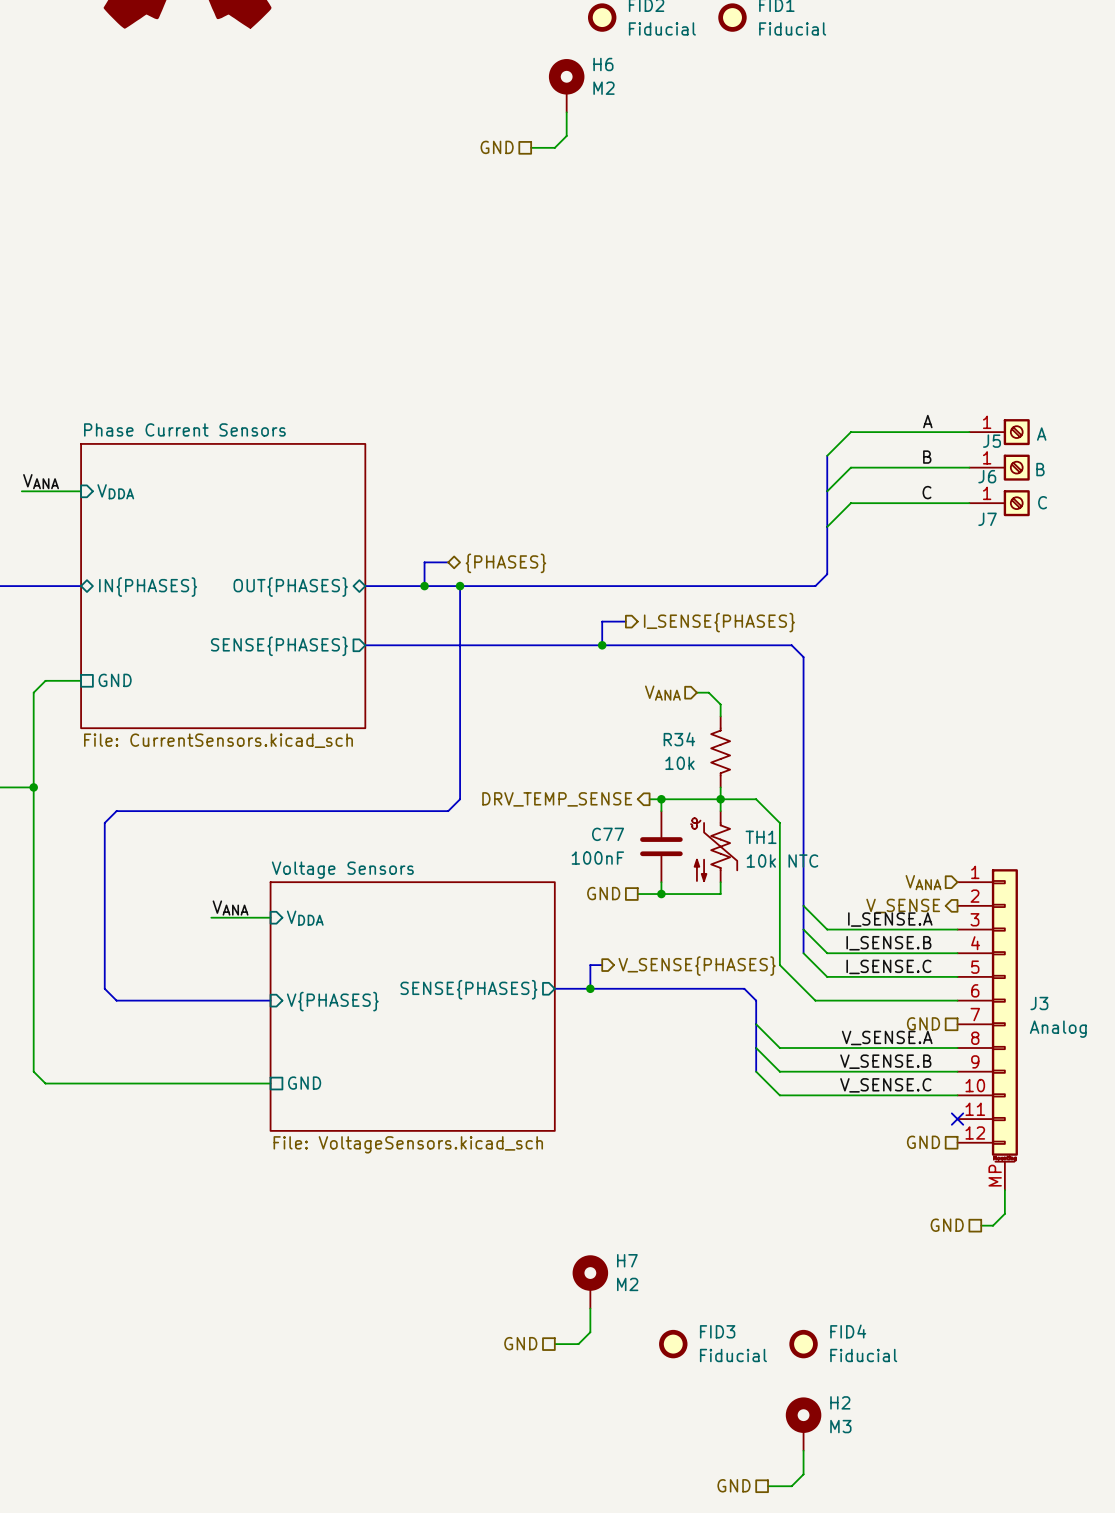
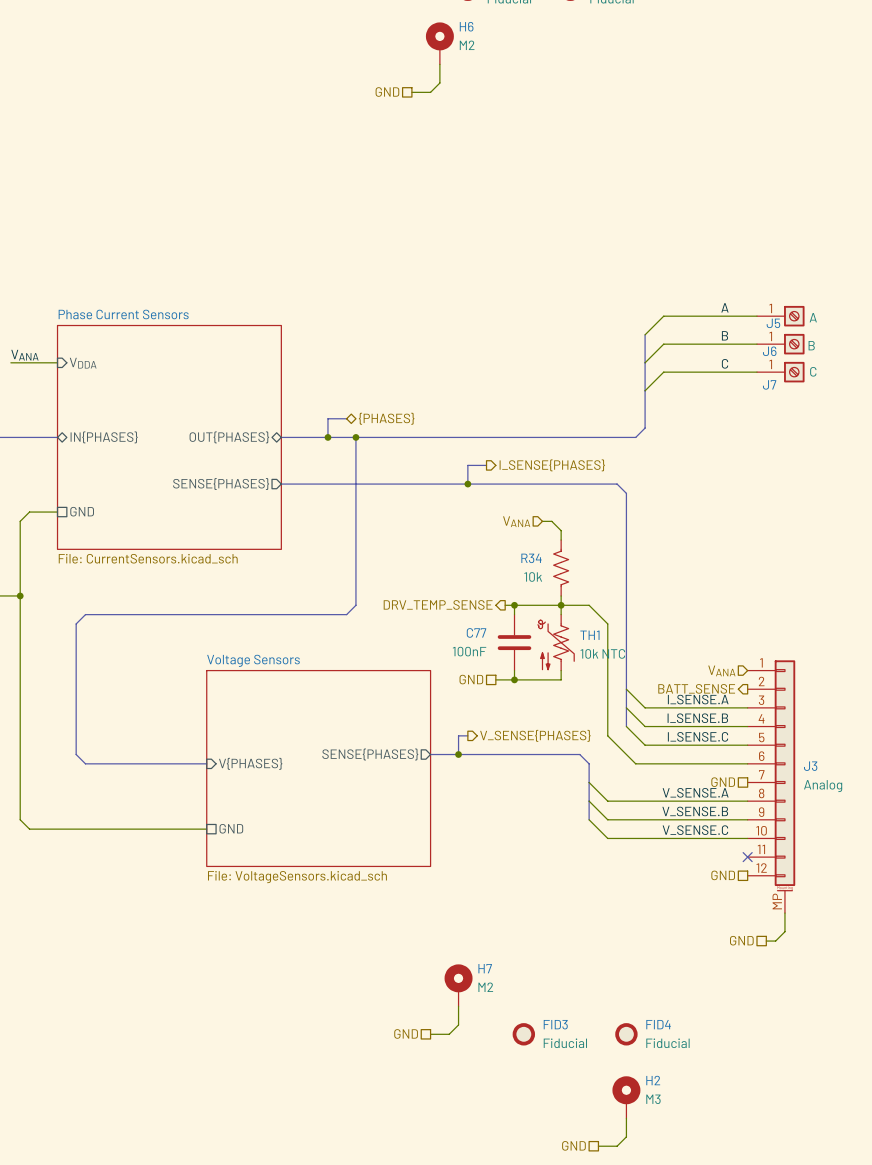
hierarchical label: V_SENSE (903, 905) -> BATT_SENSE (696, 688)
label: VANA (230, 908) -> none
wire: (211, 917) (270, 917) -> none
sheet pin: VDDA (305, 918) -> none

